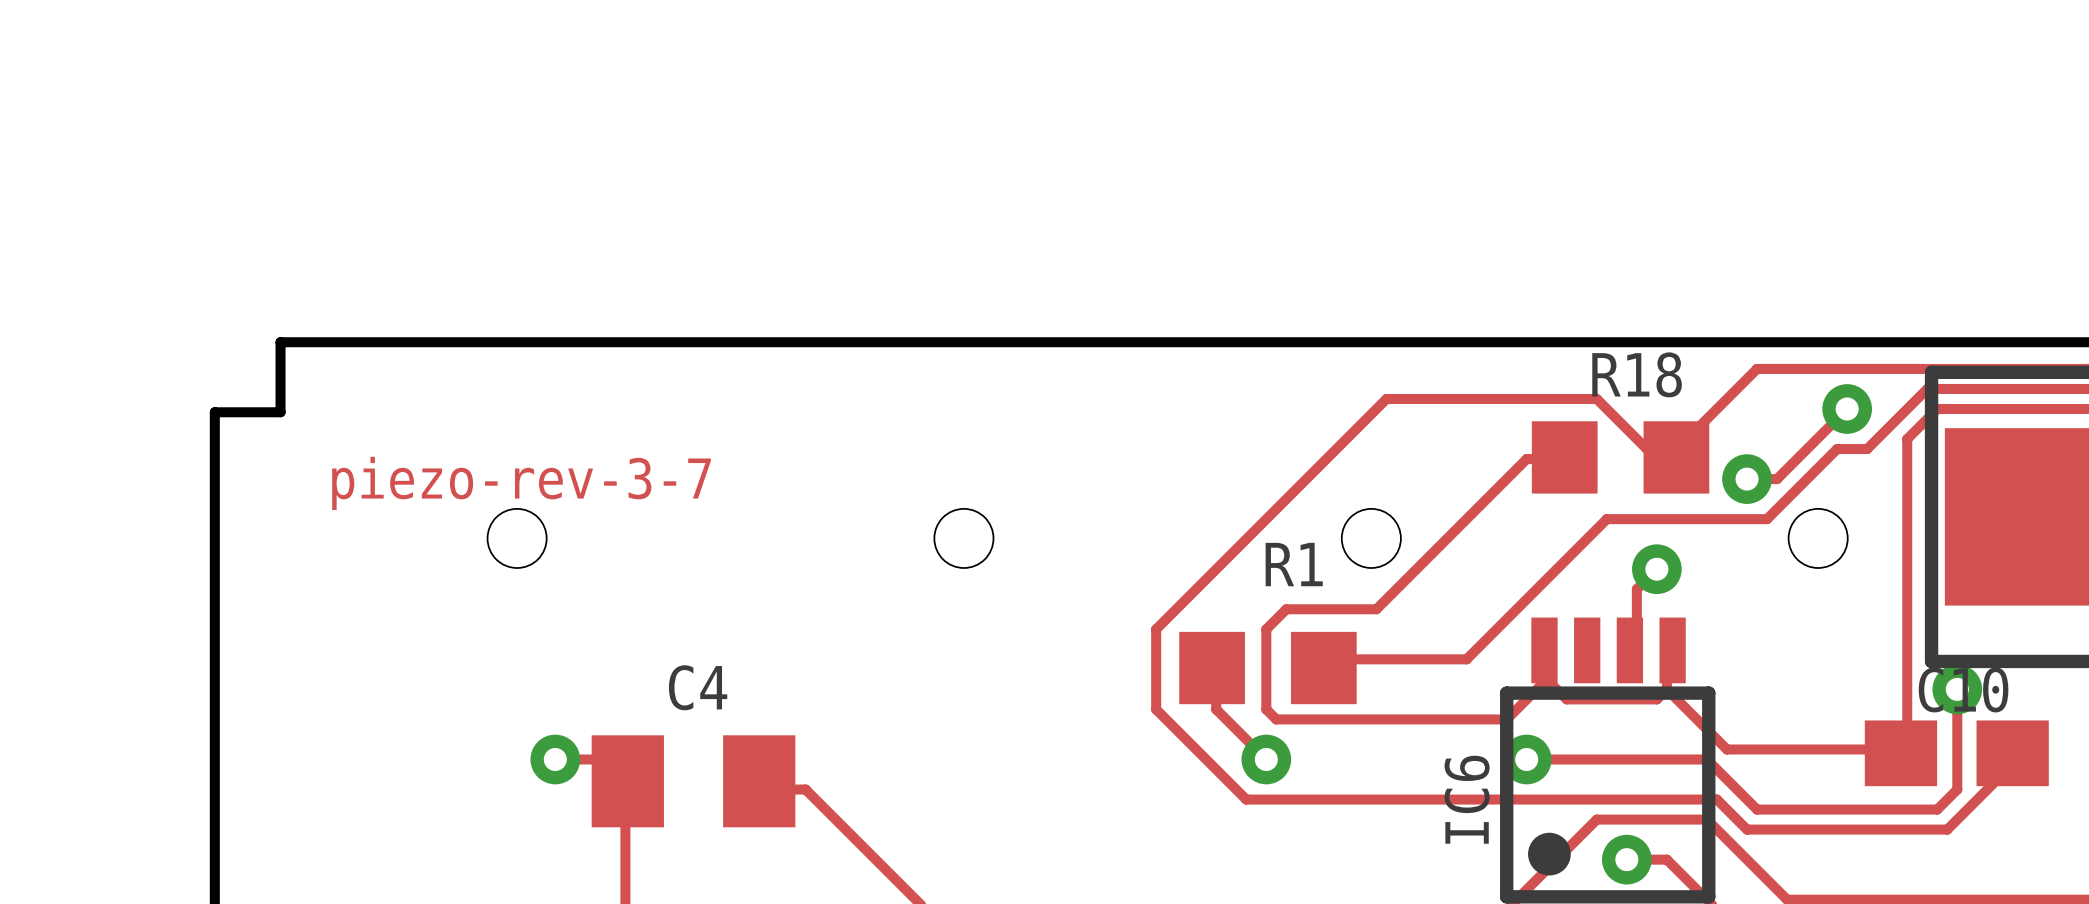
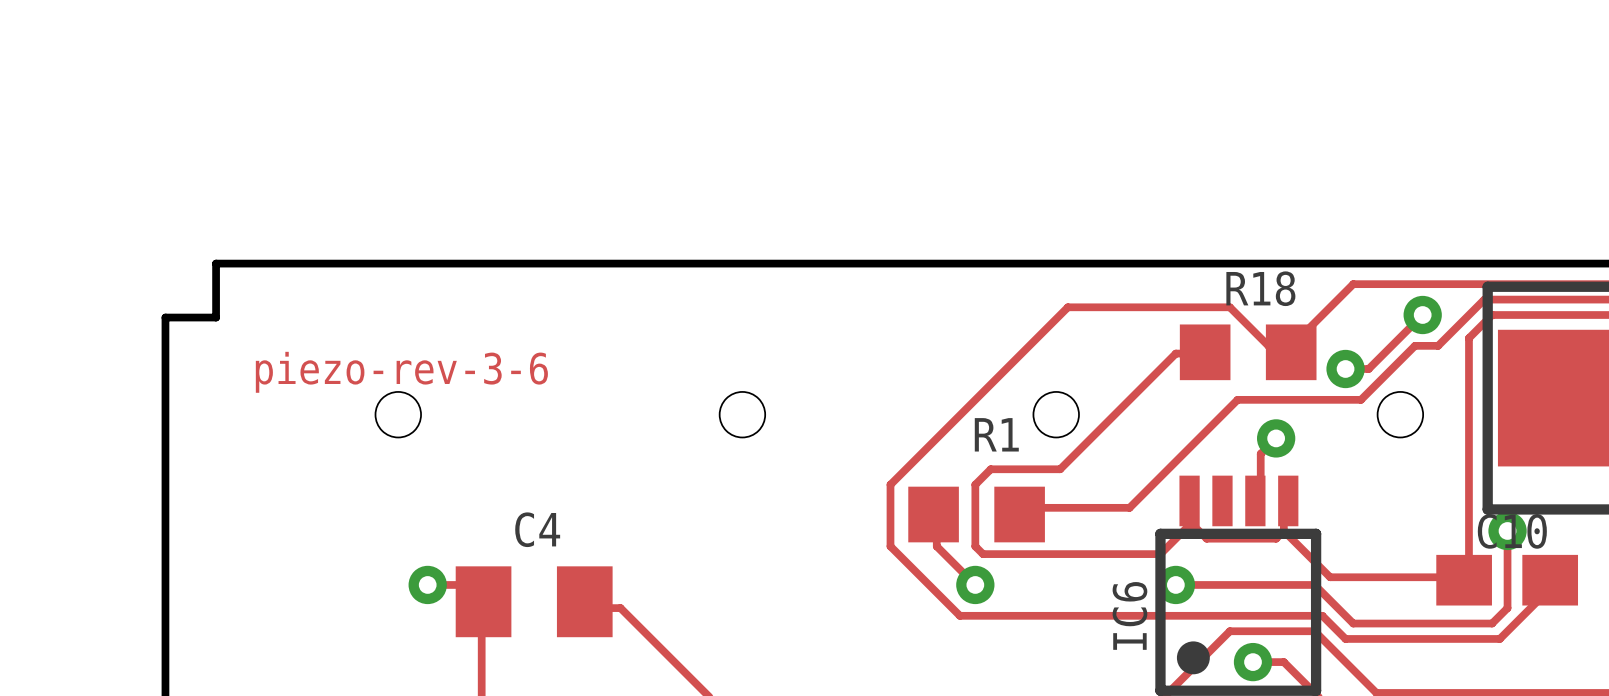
text: piezo-rev-3-7 (521, 483) -> piezo-rev-3-6 (401, 372)

